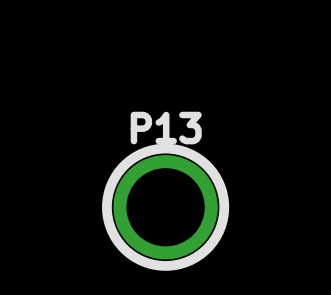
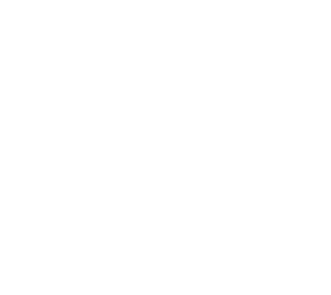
P13: (165, 207) -> none

